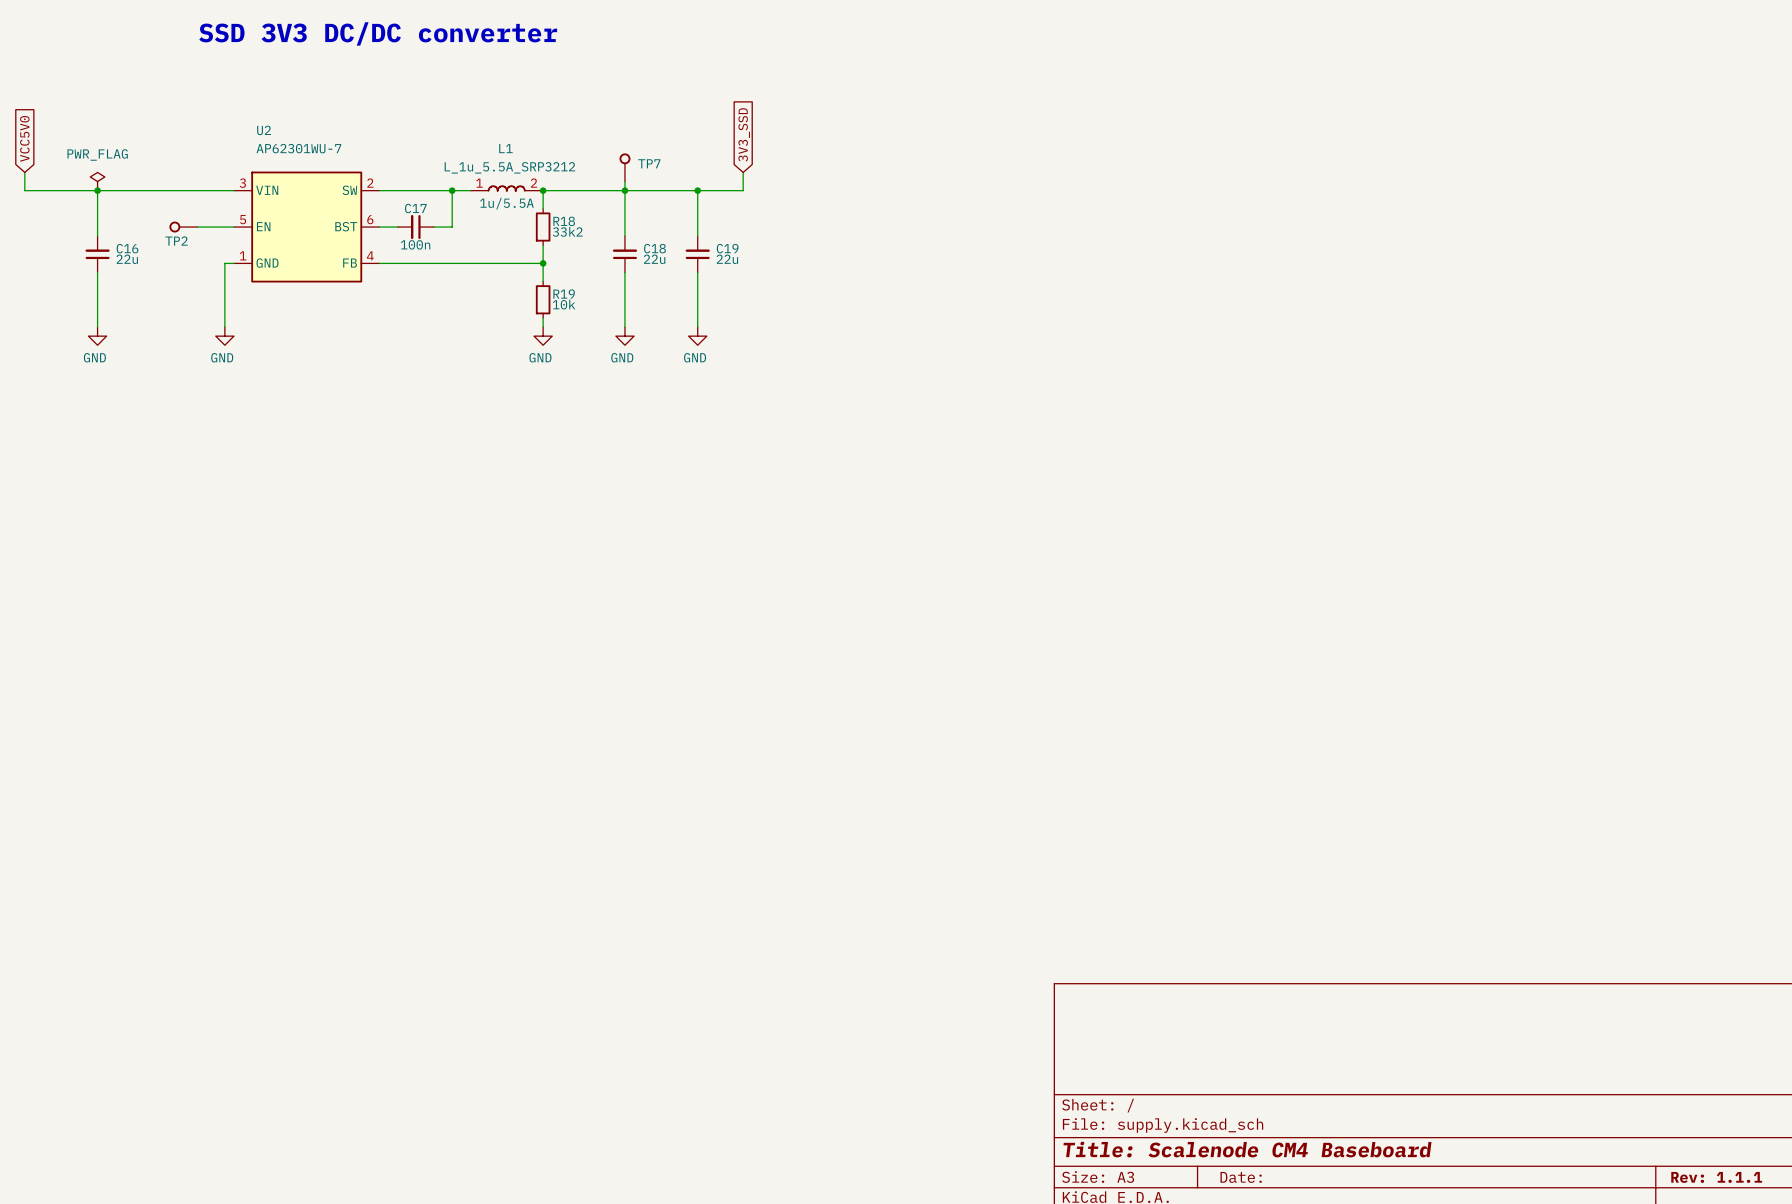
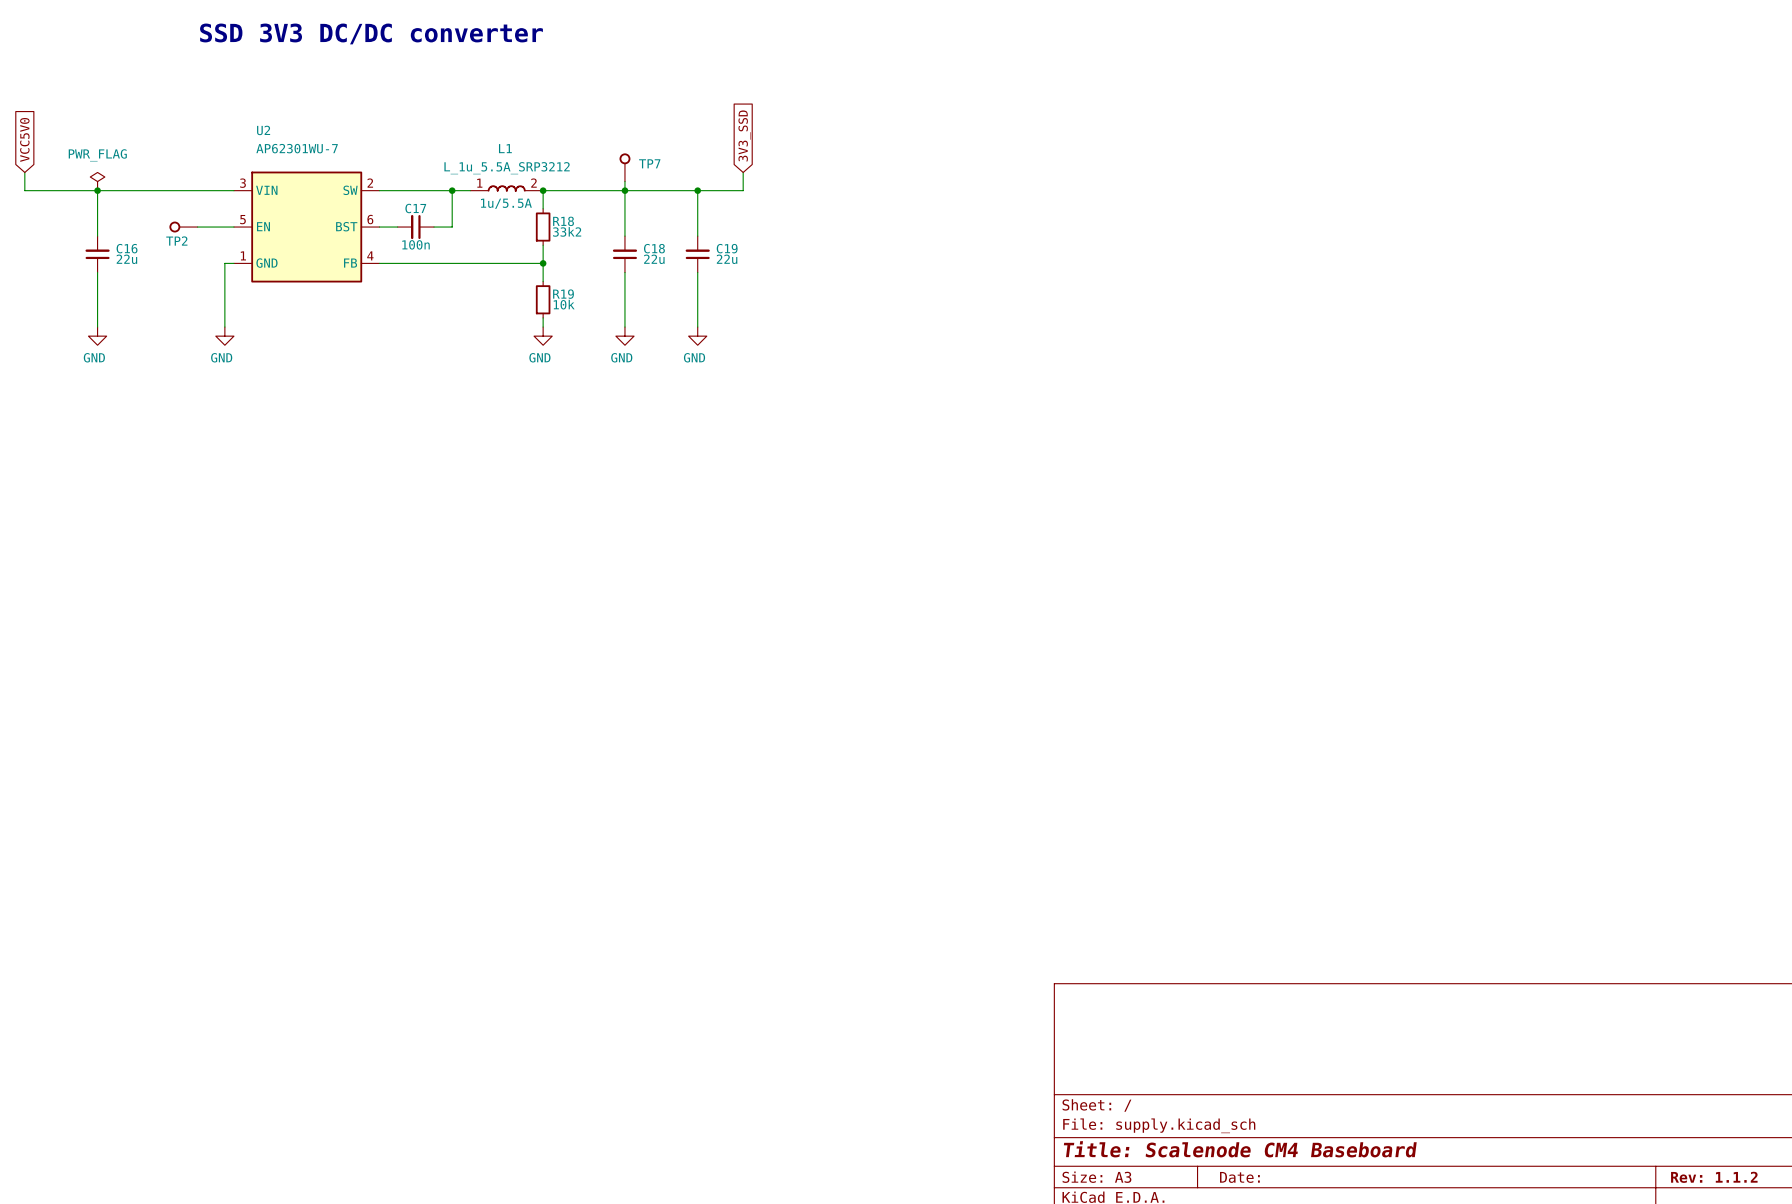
title block: Rev: 1.1.1 (1716, 1177) -> Rev: 1.1.2 (1714, 1177)

